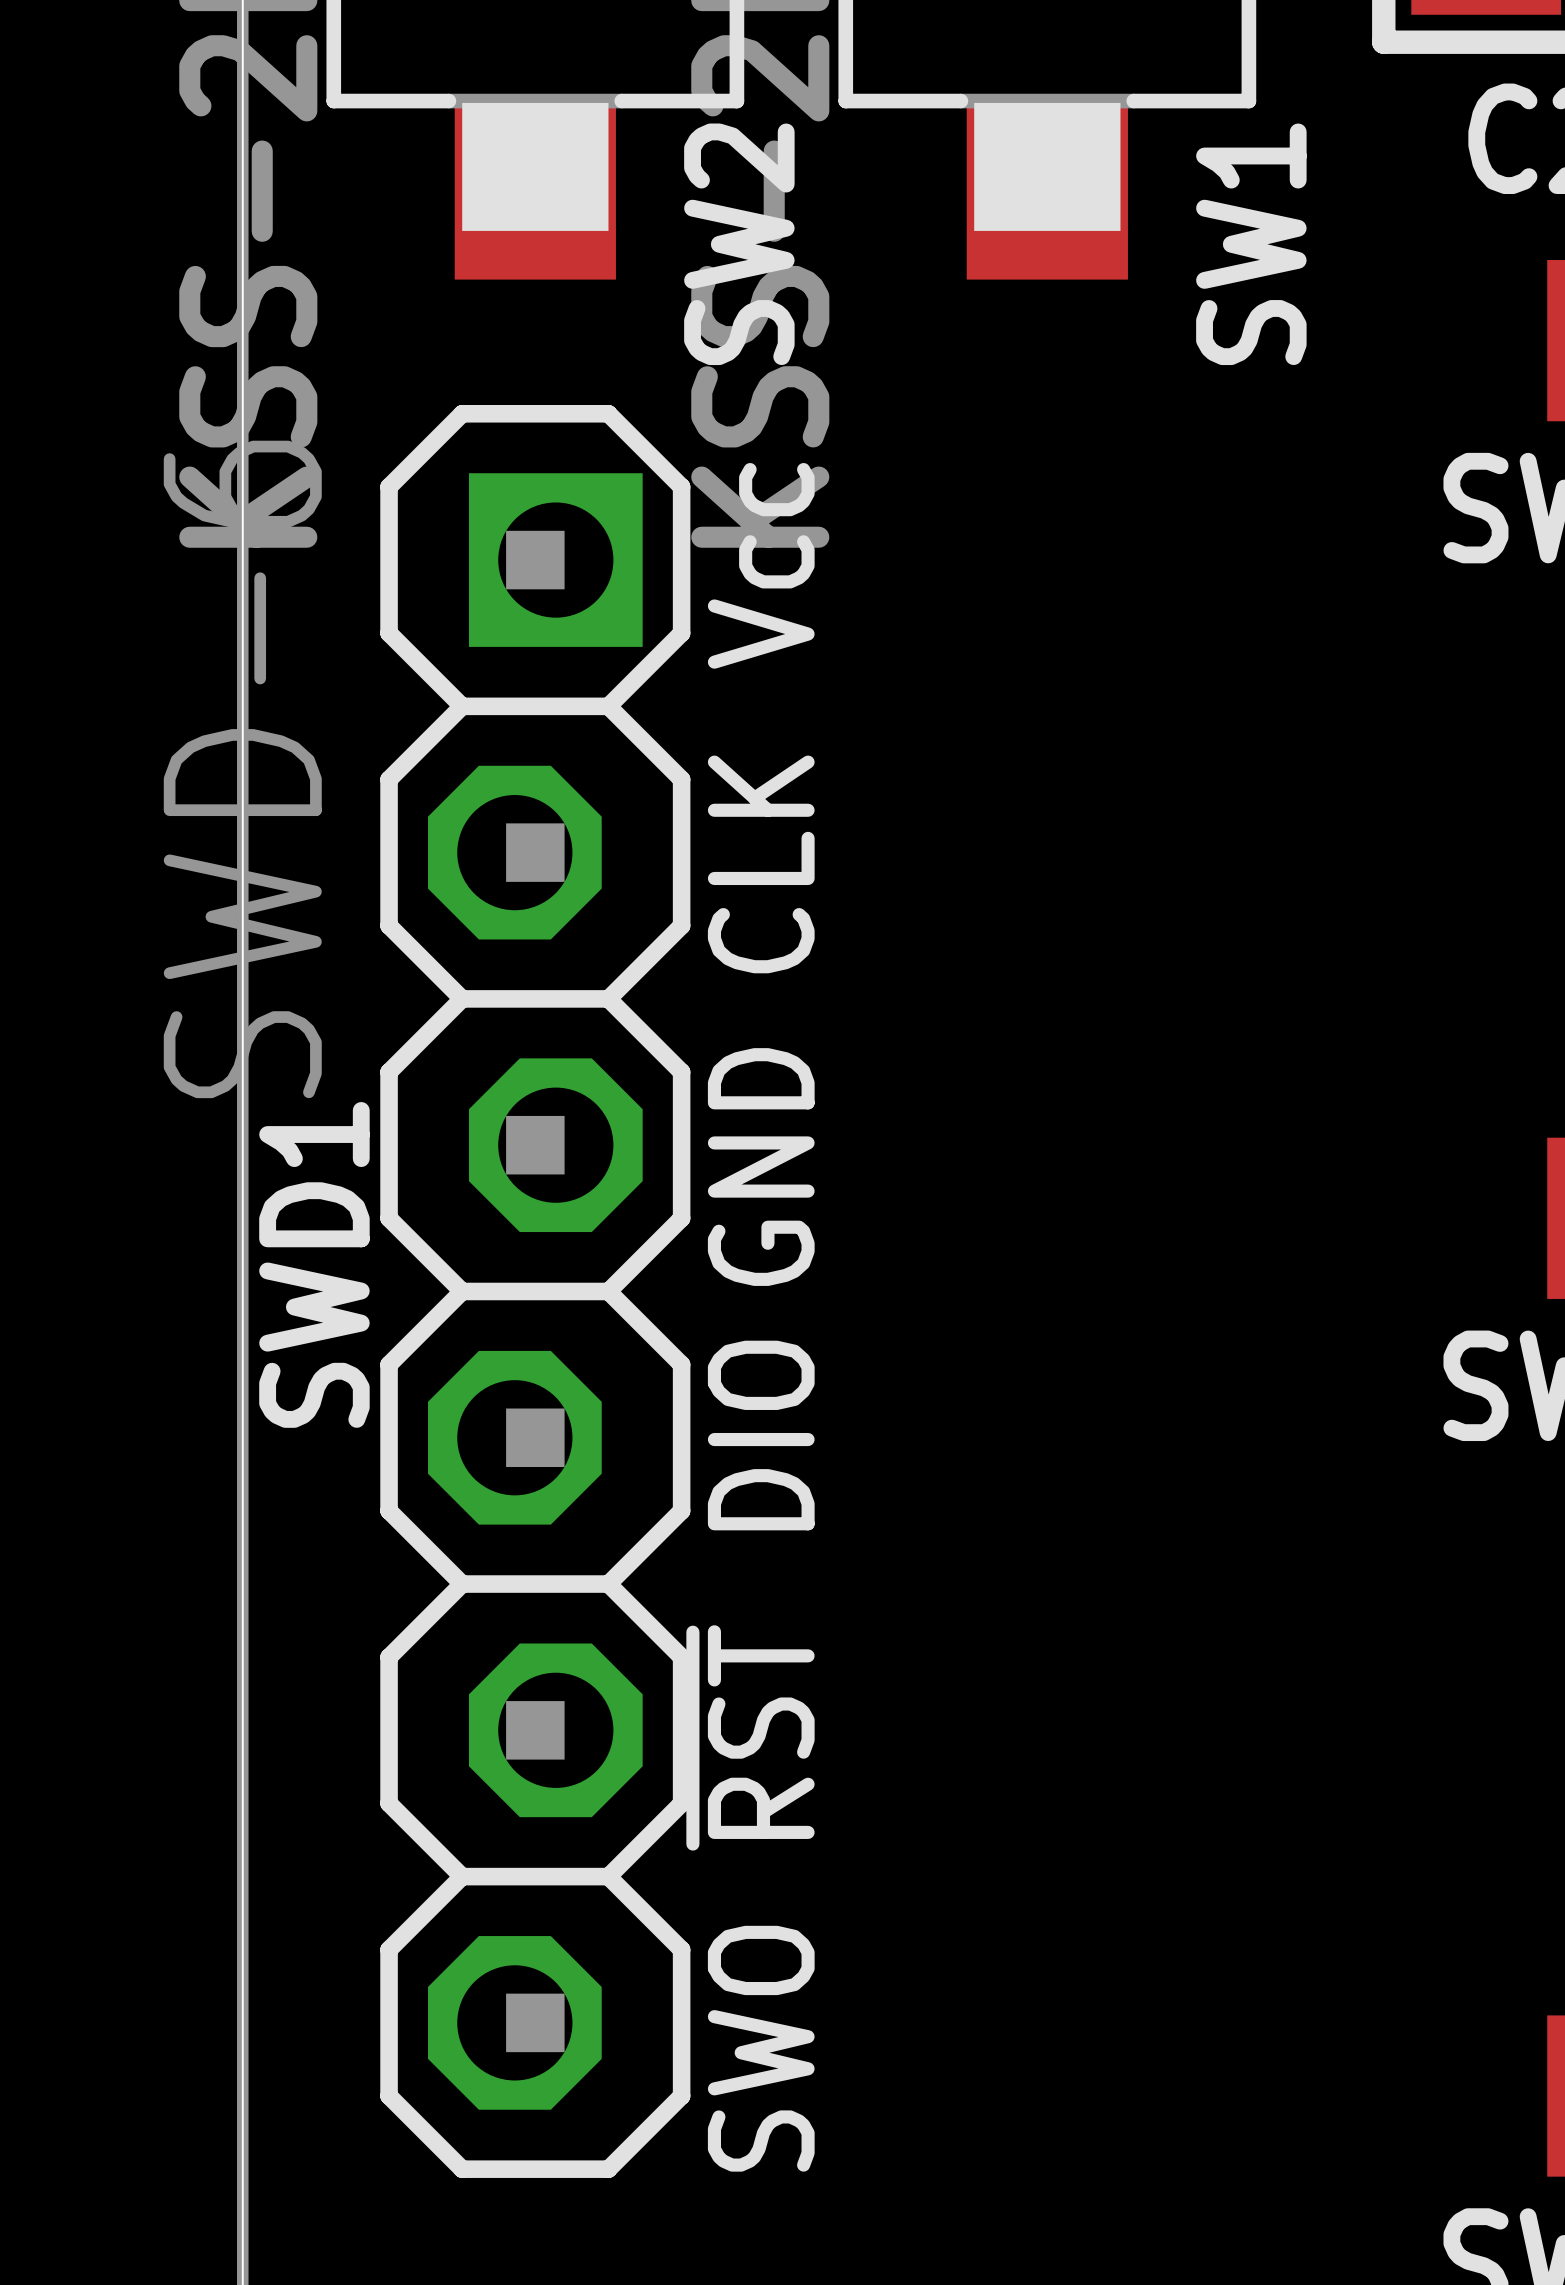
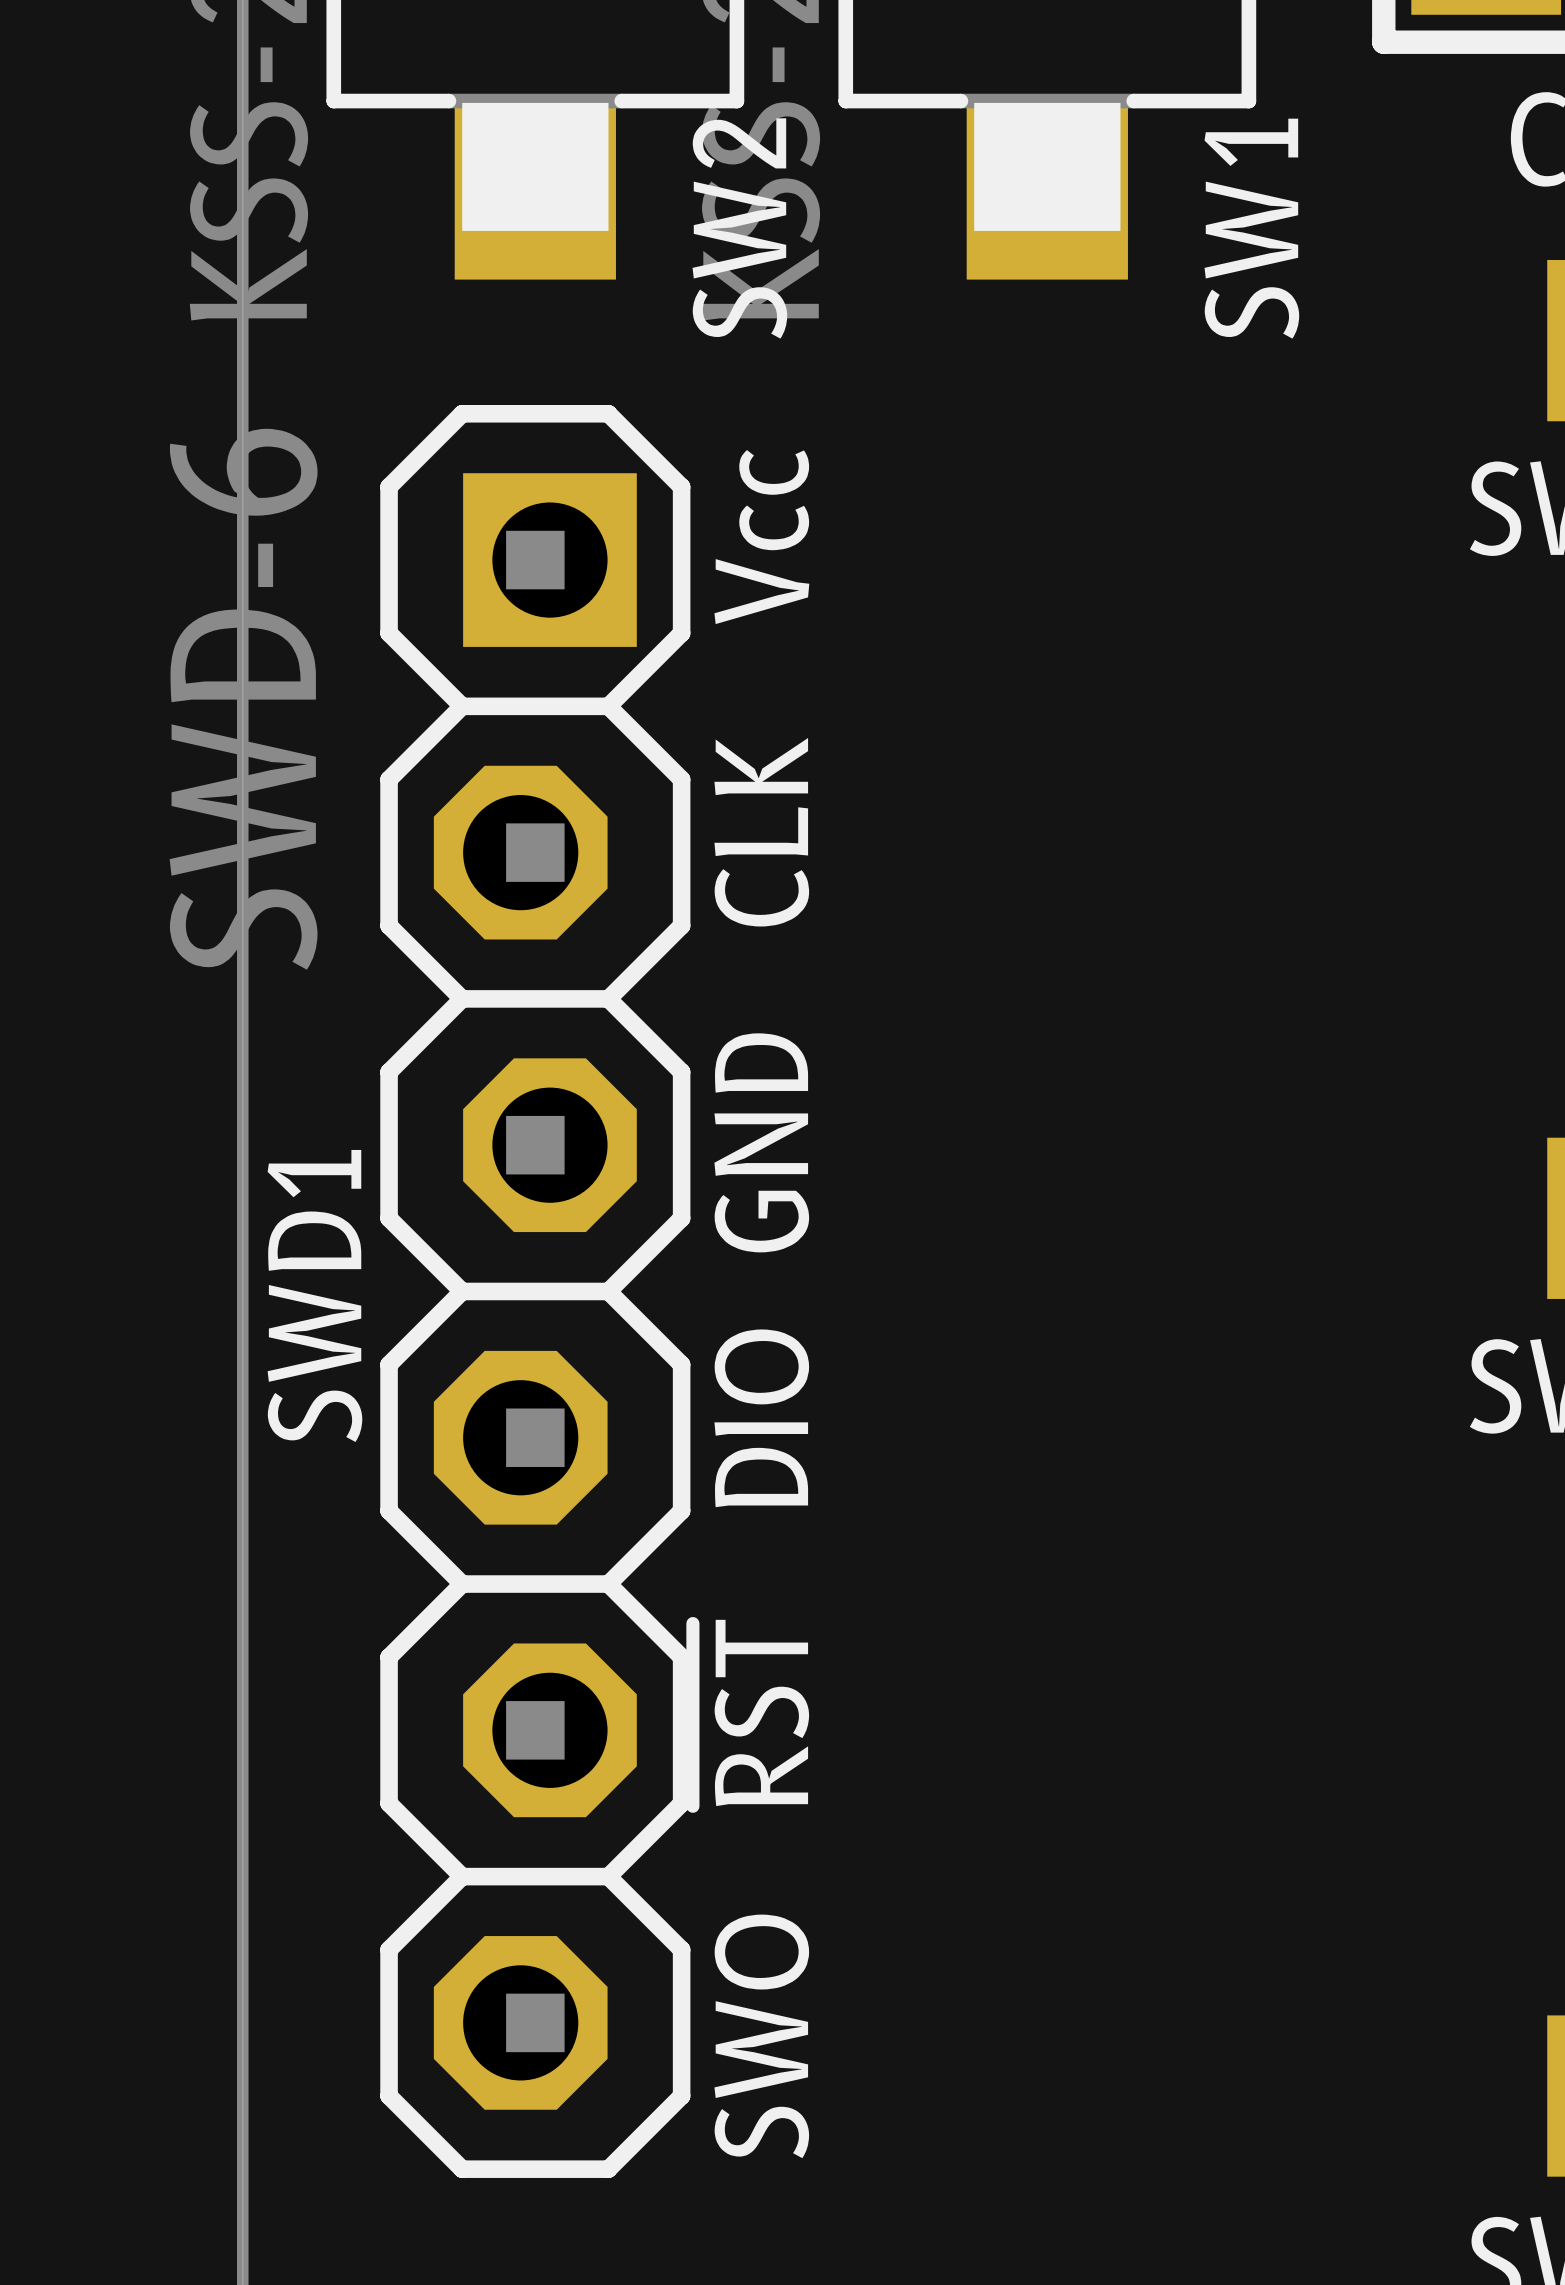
SWD1 footprint: [380, 405, 691, 2178] -> [380, 405, 691, 2178]

